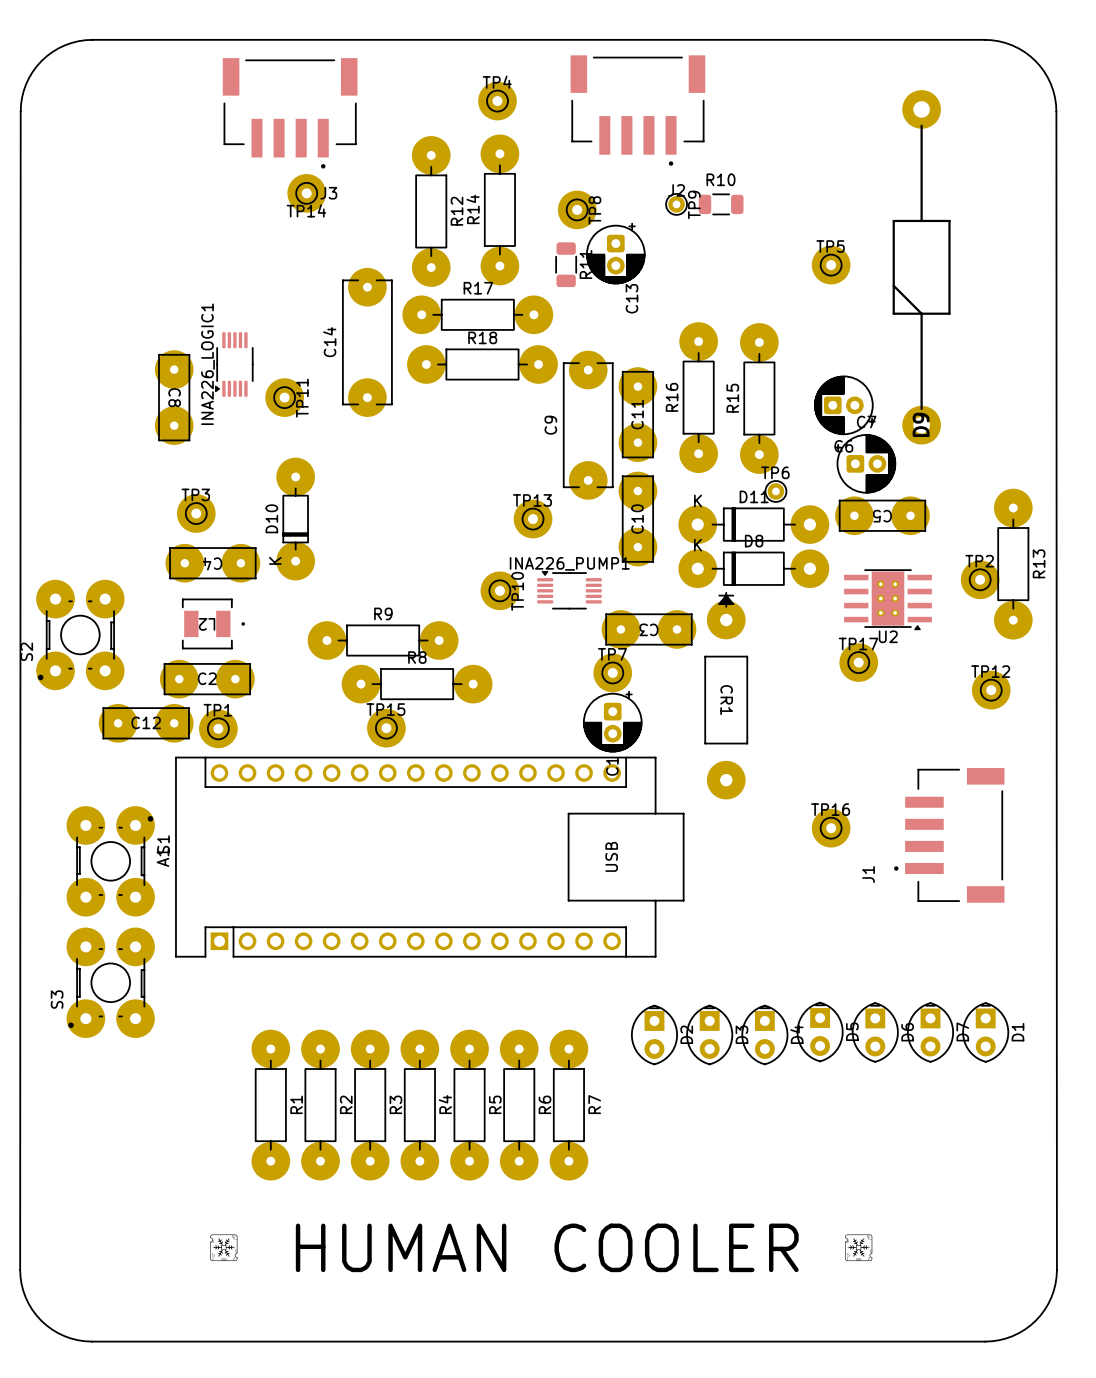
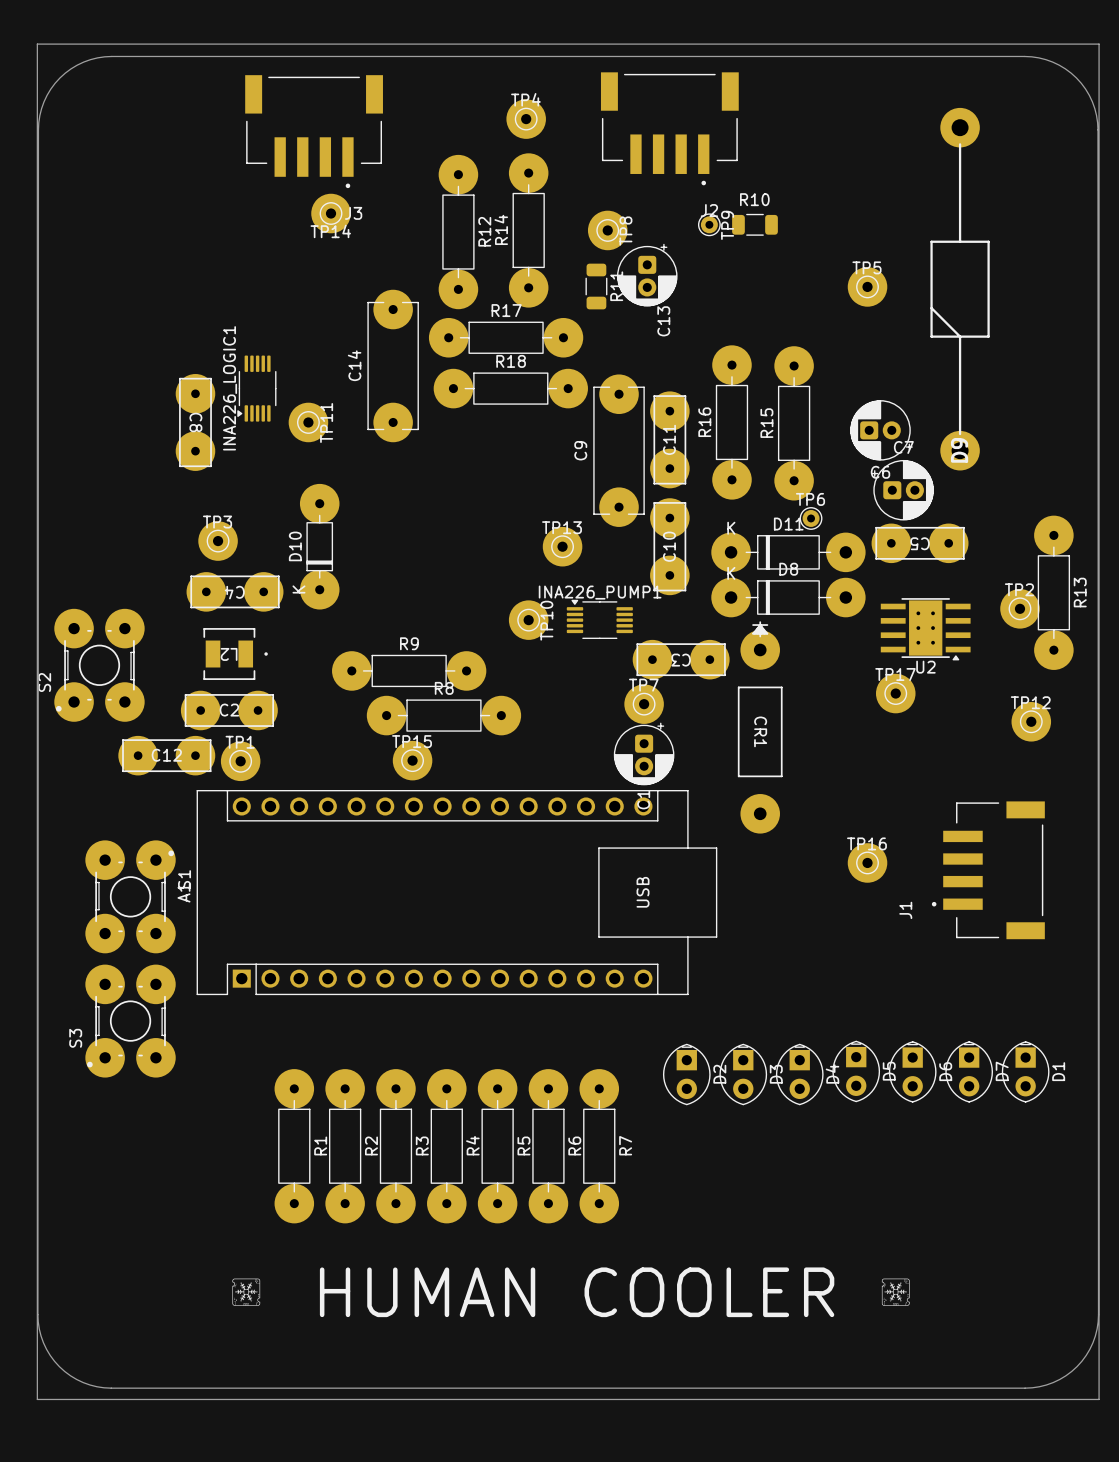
board edge: none -> (37, 44) (1099, 44) (1099, 1399) (37, 1399) (37, 44)

